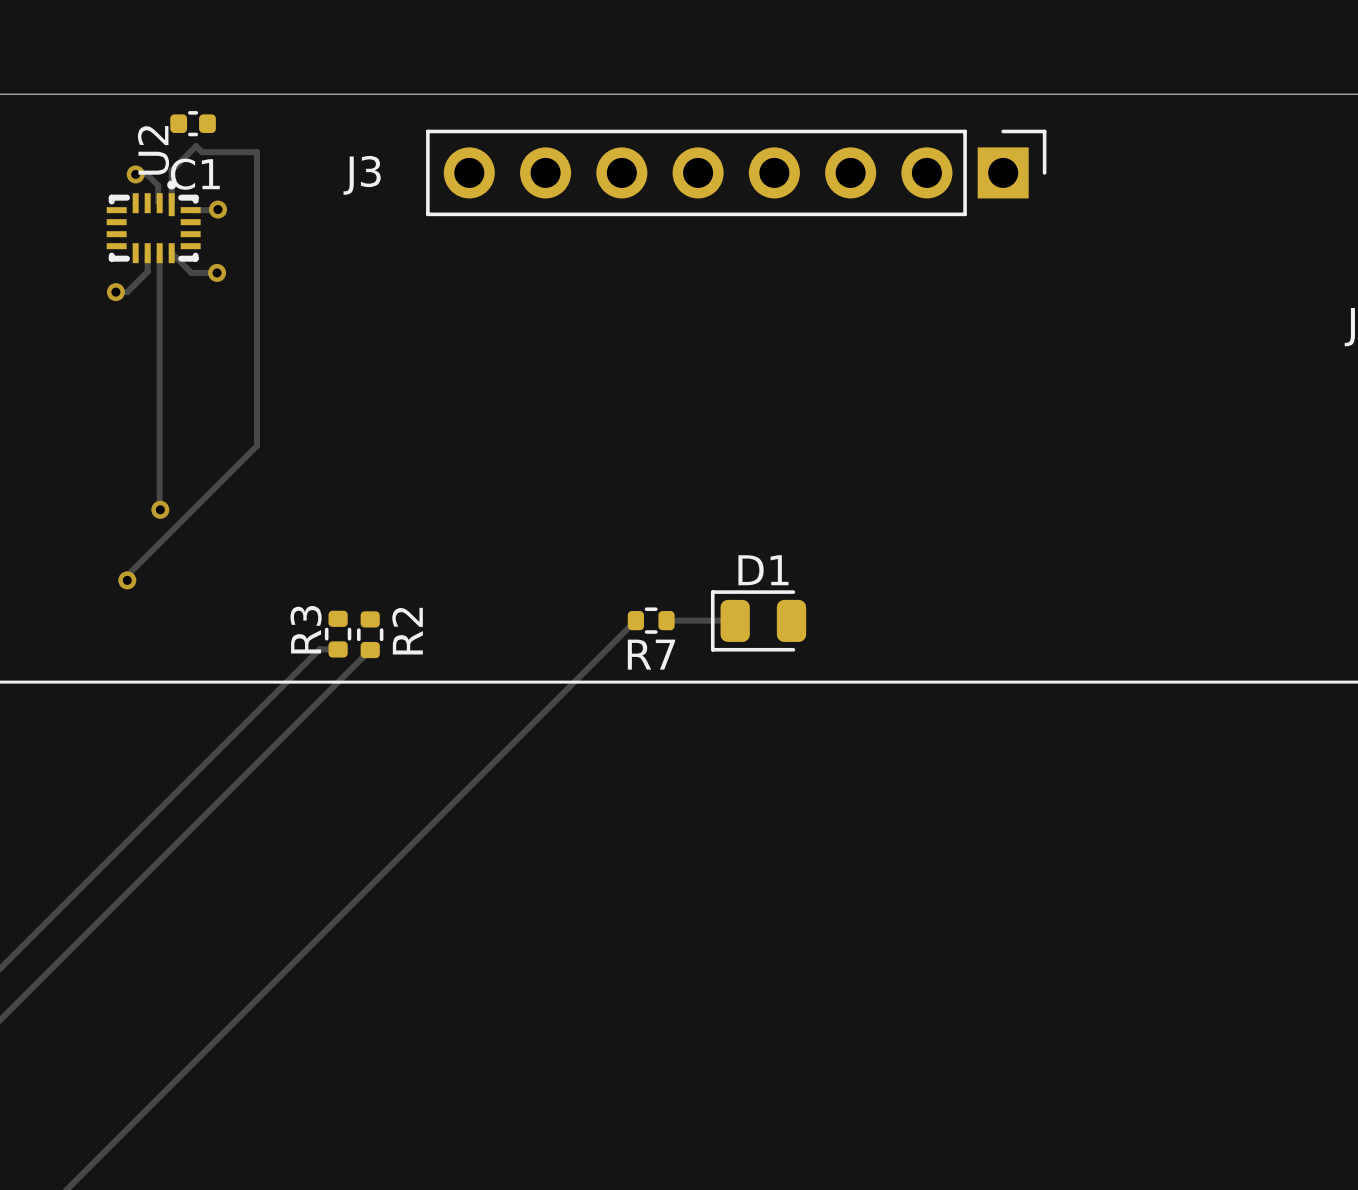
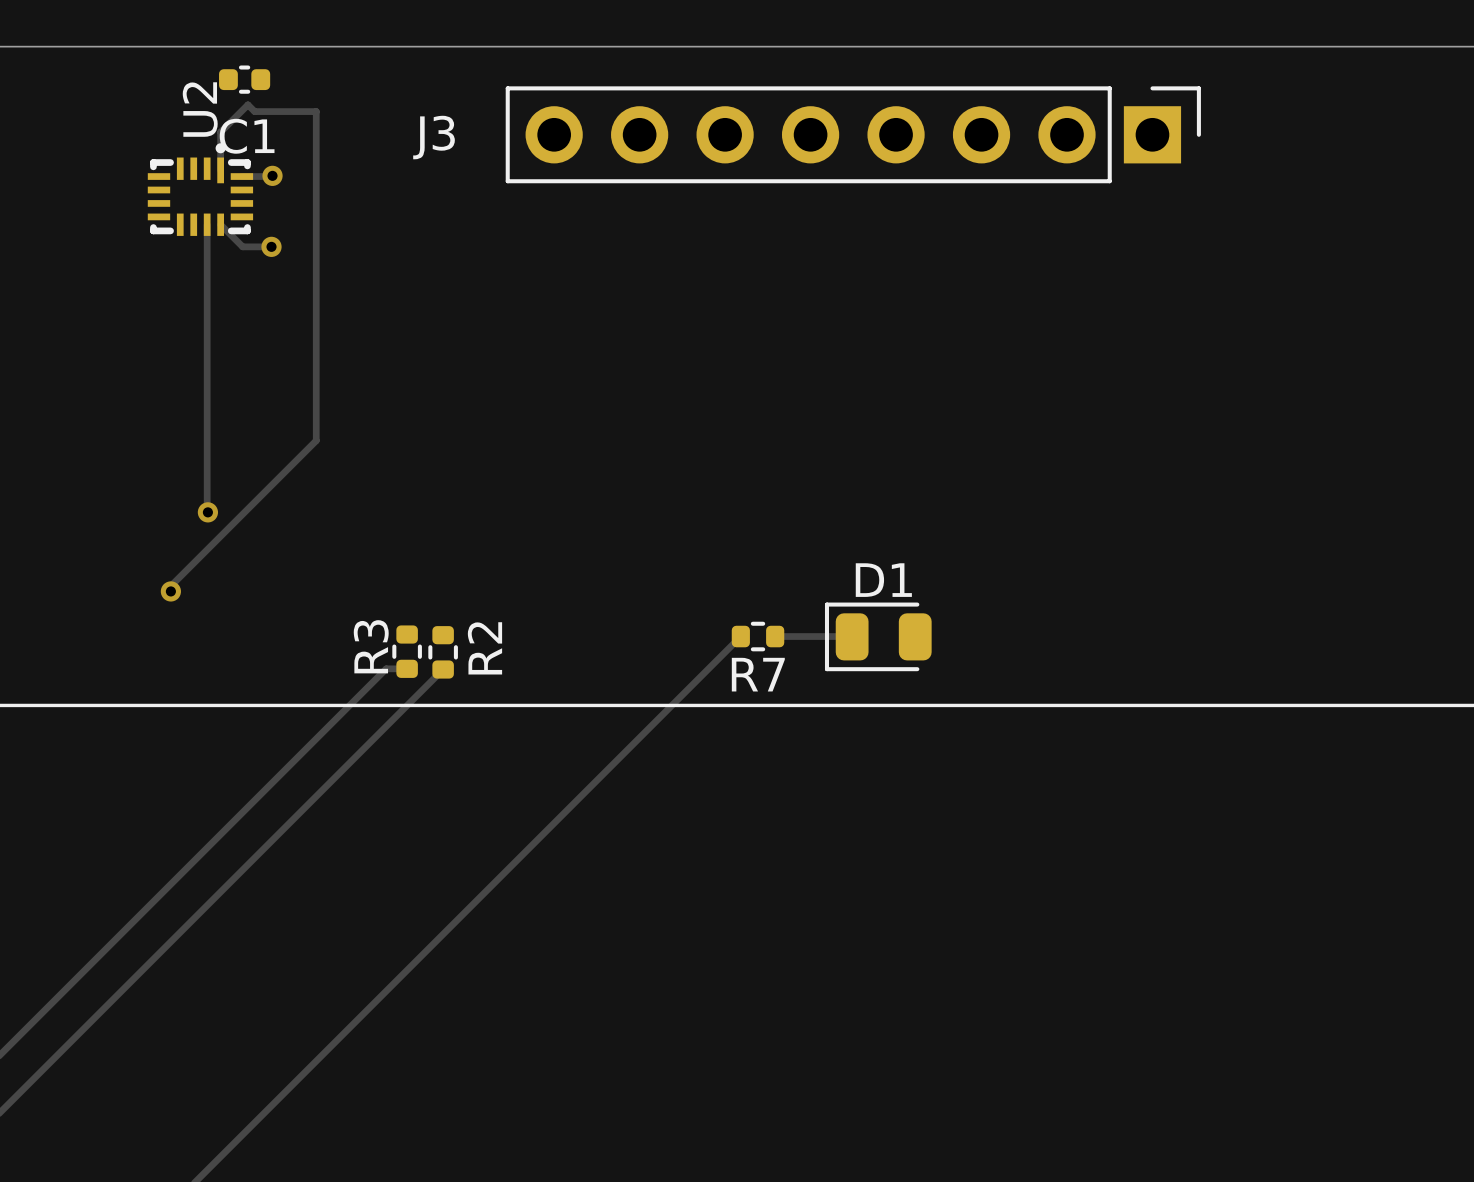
track: (135, 174) (146, 174) (158, 185) (159, 203) -> none
via: (135, 174) -> none
track: (147, 253) (147, 271) (127, 292) (115, 292) -> none
via: (115, 292) -> none

